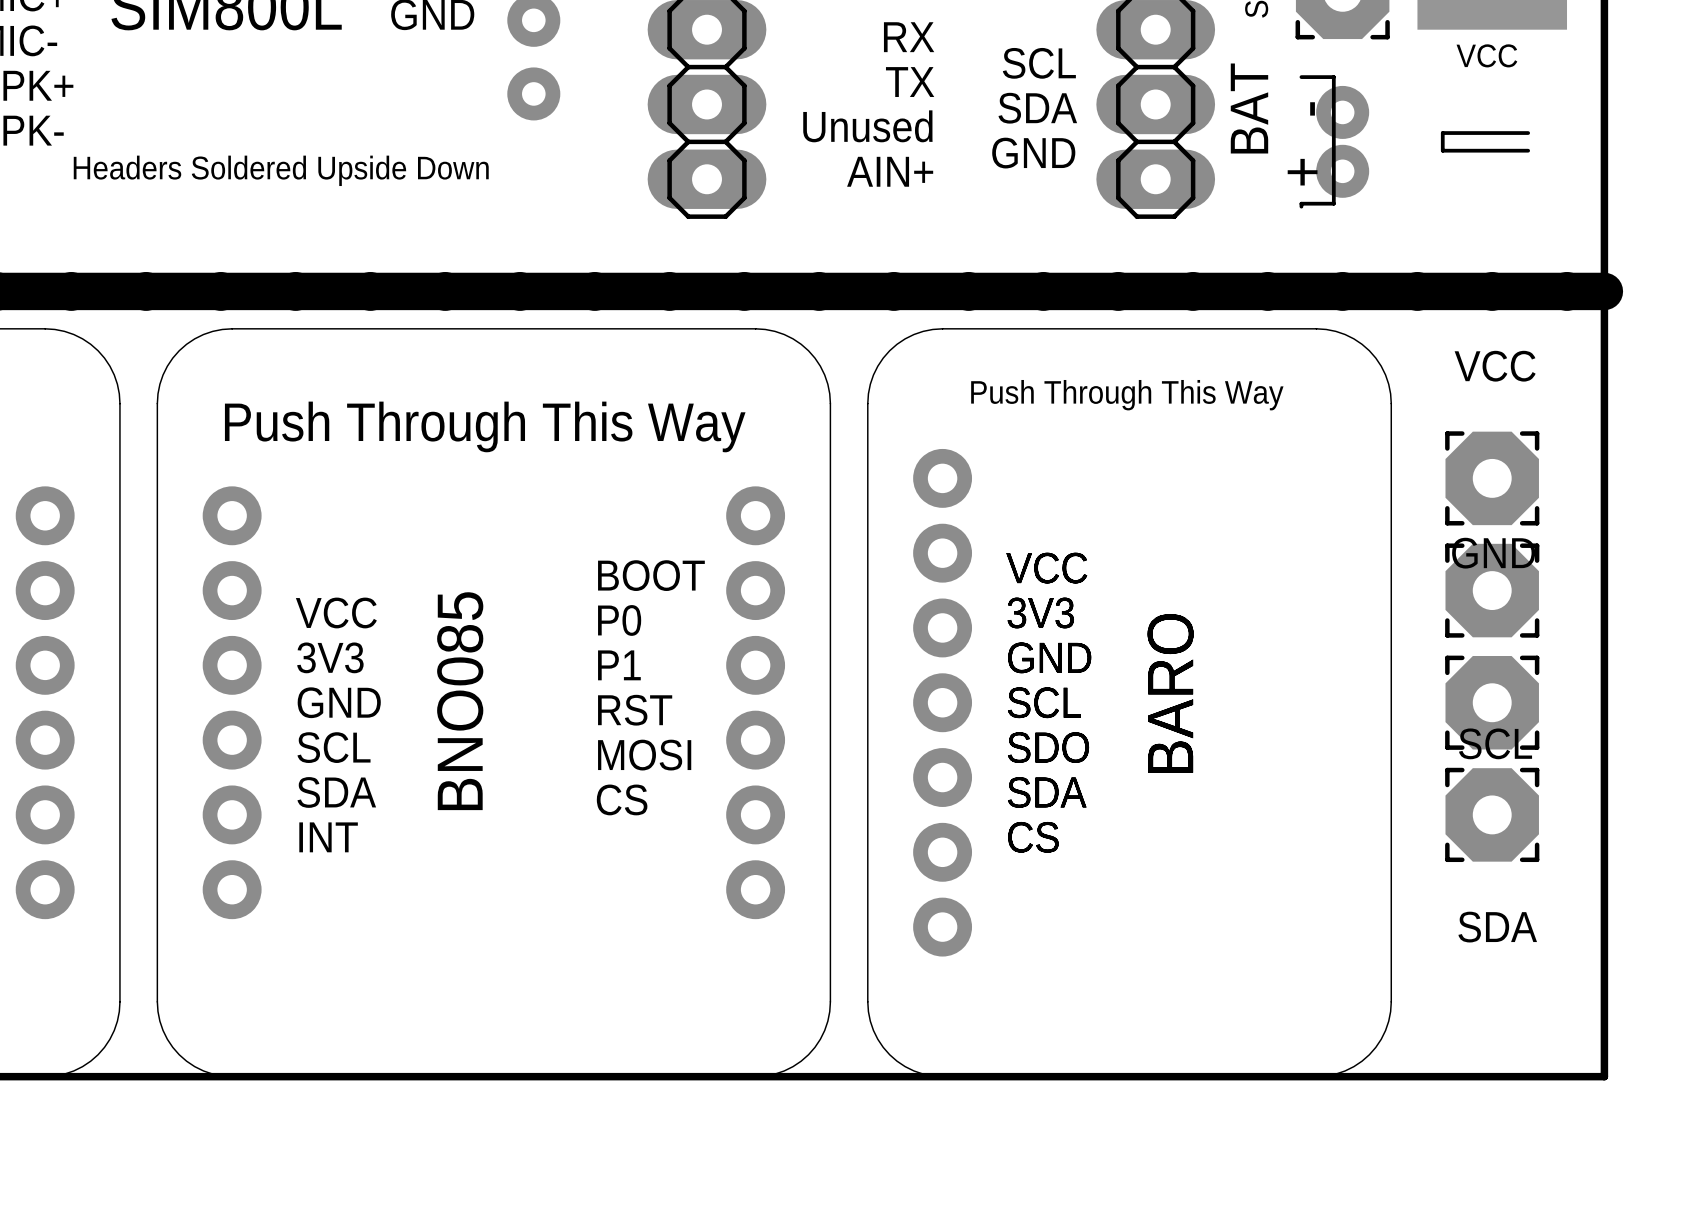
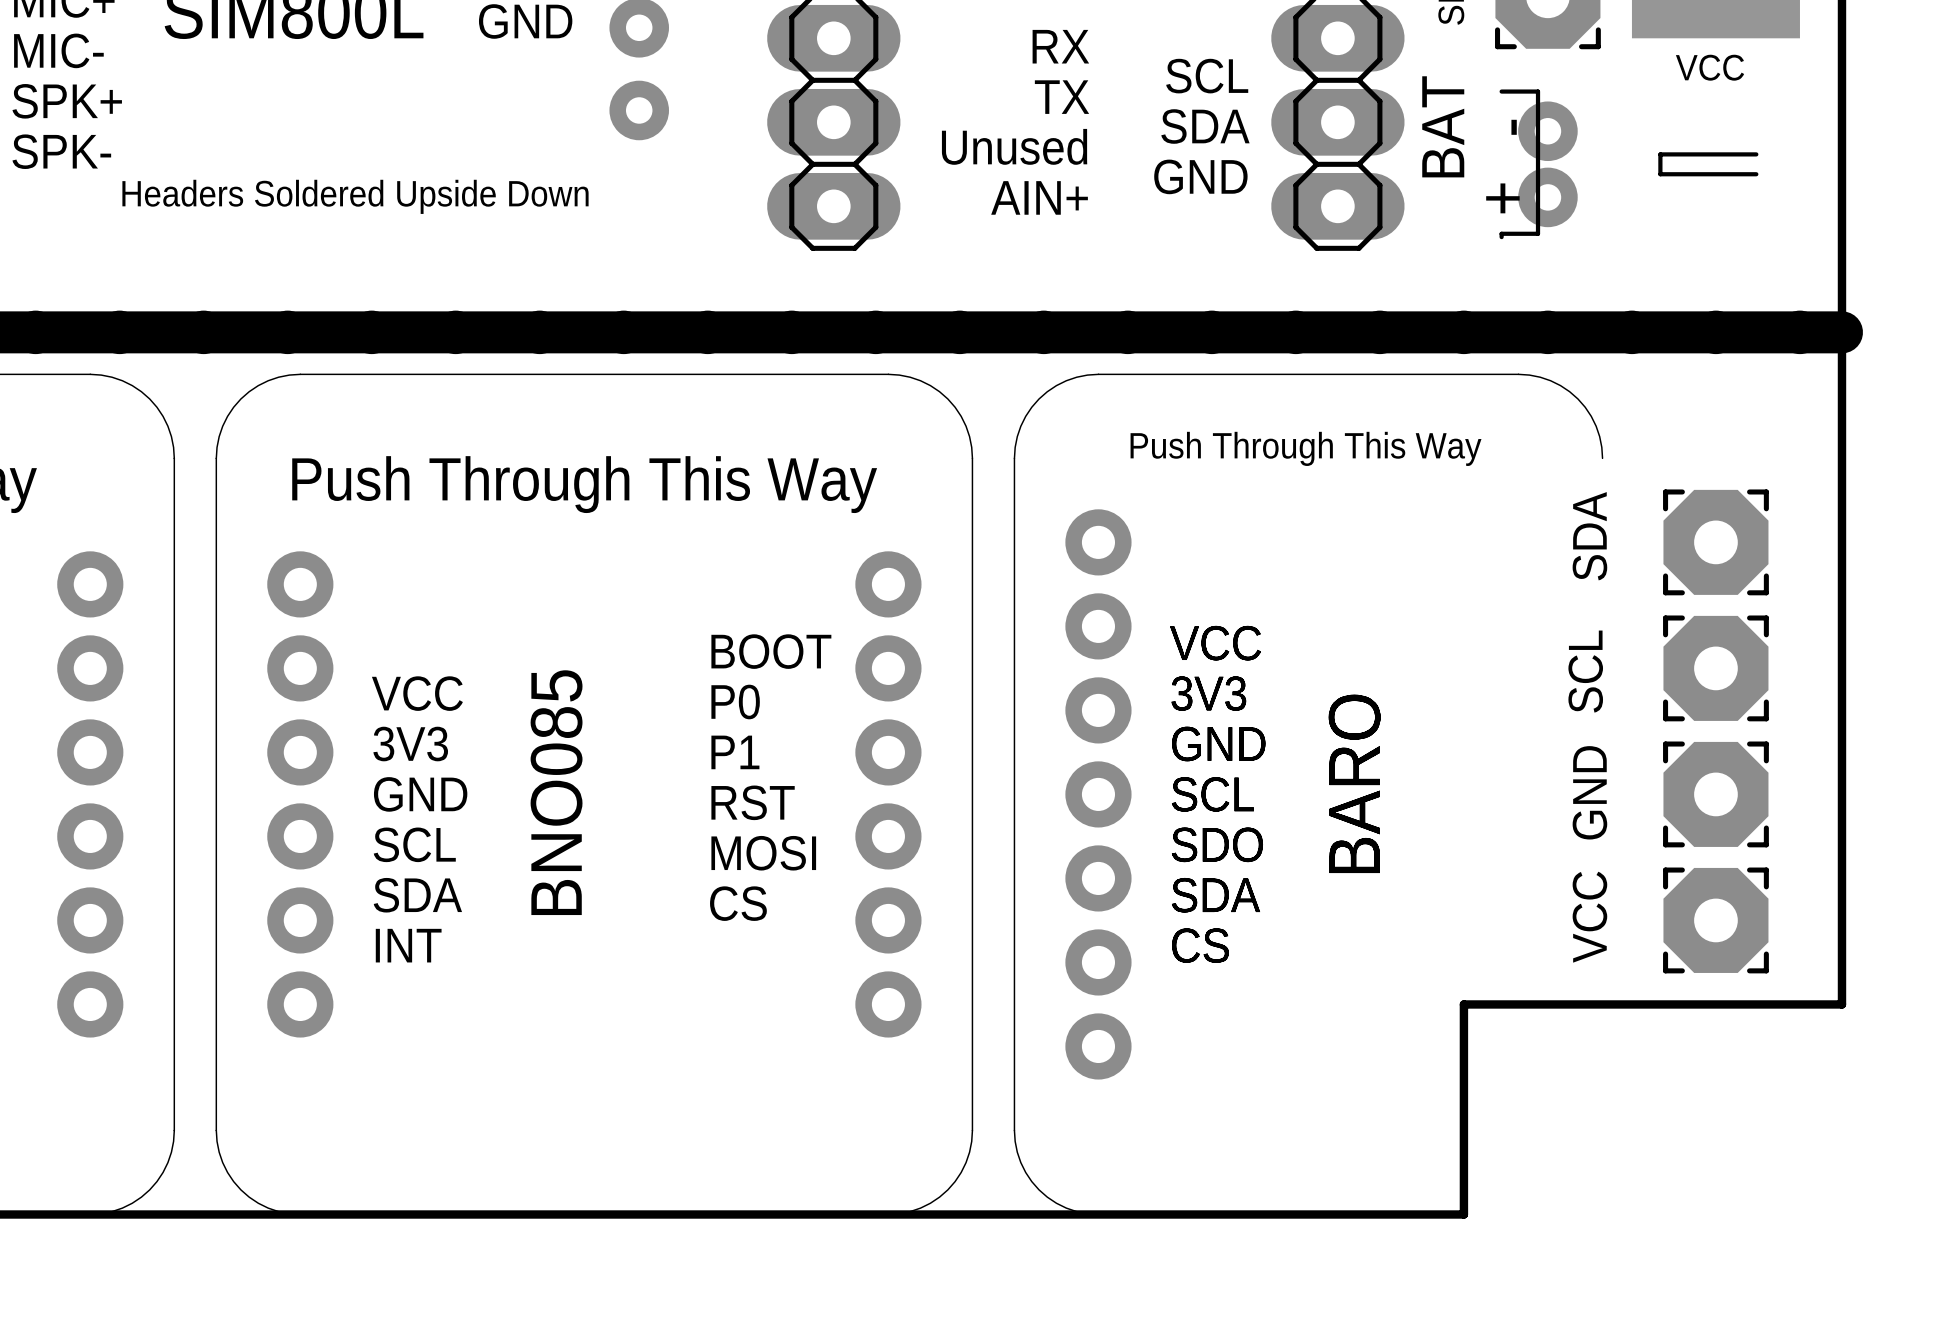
text rotation: 0° (1495, 366) -> 90° counterclockwise (1589, 917)
text position: VCC (1495, 366) -> VCC (1589, 917)
line: (1391, 403) (1391, 1001) (1388, 1021) (1381, 1039) (1362, 1061) (1345, 1070) (1326, 1076) (942, 1076) -> none
text rotation: 0° (1493, 553) -> 90° counterclockwise (1589, 792)
text position: GND (1493, 553) -> GND (1589, 792)
text rotation: 0° (1495, 743) -> 90° counterclockwise (1585, 671)
text position: SCL (1495, 743) -> SCL (1585, 671)
board edge: (1604, 889) (1604, 1076) (1267, 1076) -> (1841, 1004) (1463, 1004) (1463, 1214)
text rotation: 0° (1497, 927) -> 90° counterclockwise (1589, 536)
text position: SDA (1497, 927) -> SDA (1589, 536)

